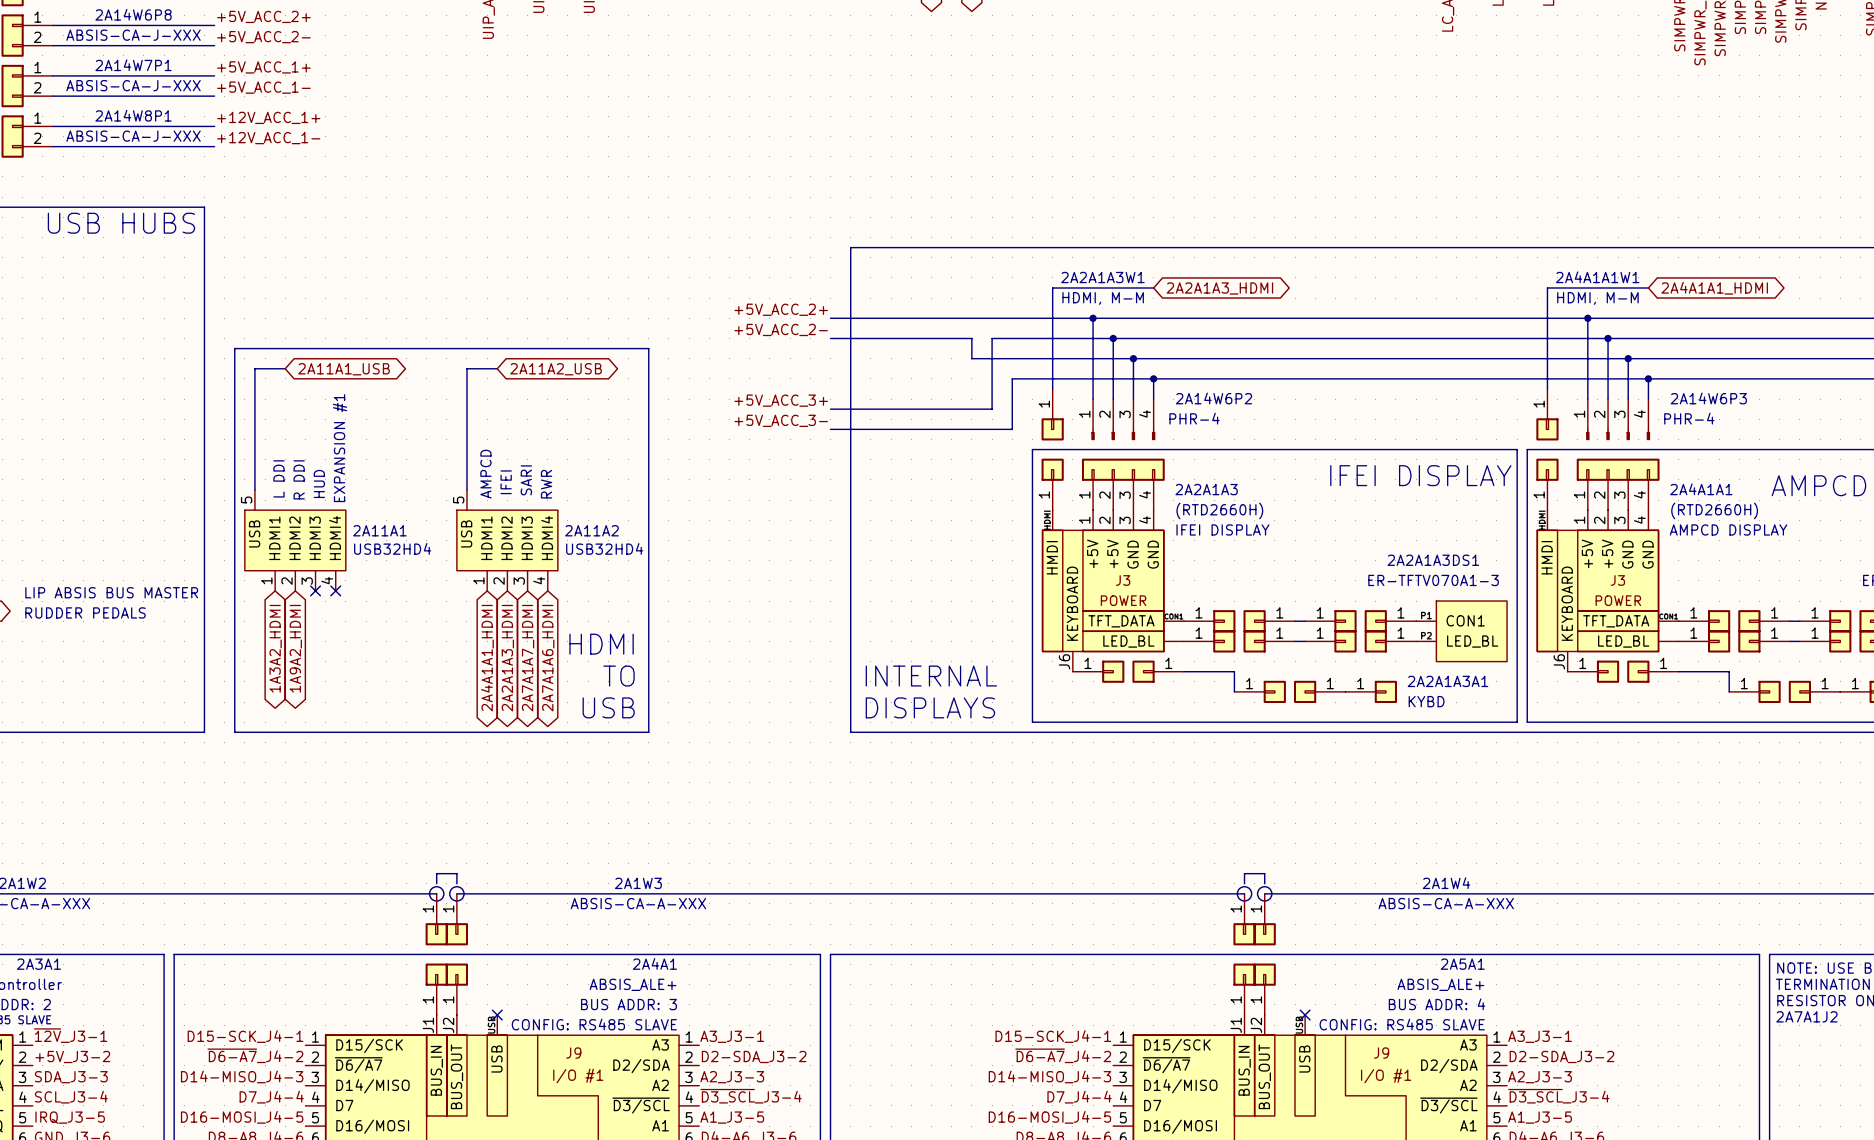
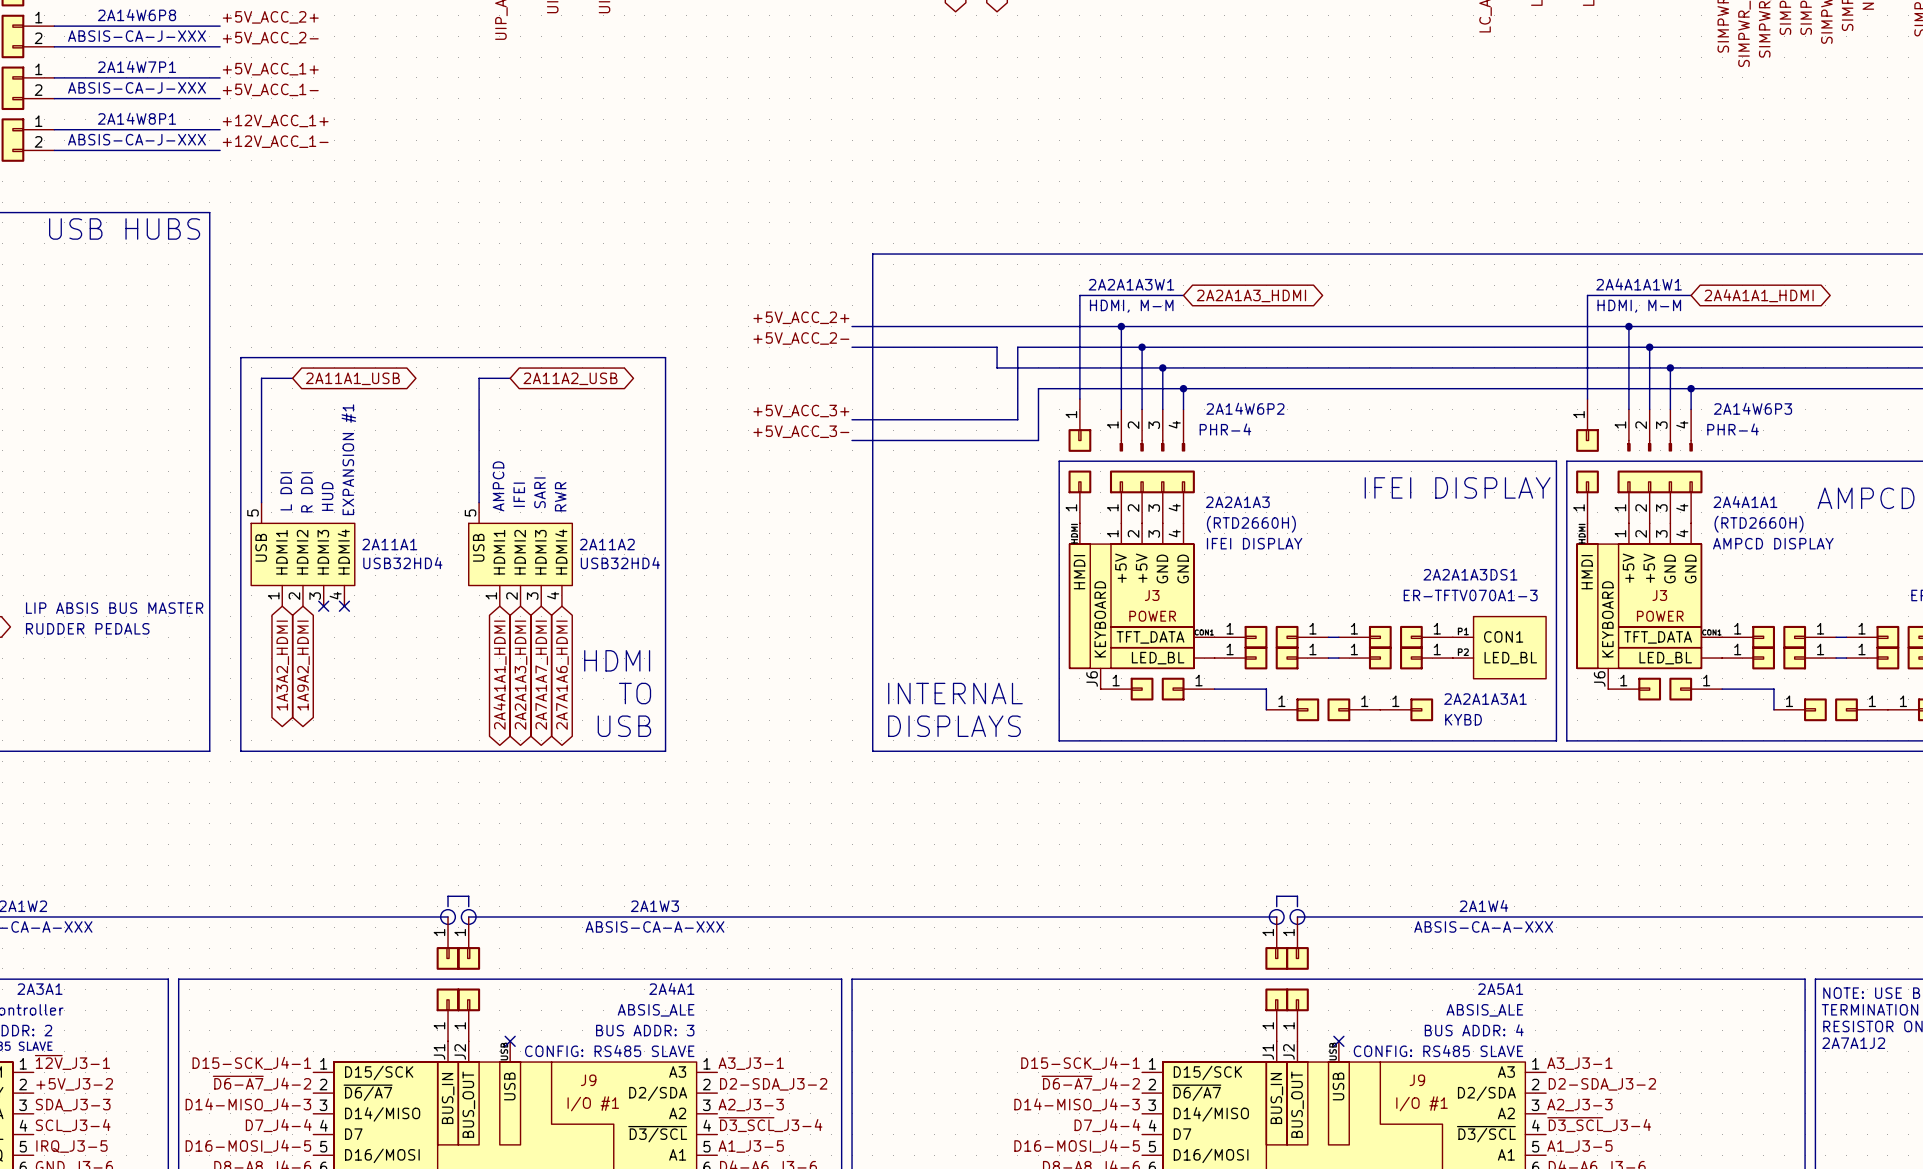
2A4A1 value: ABSIS_ALE+ (633, 984) -> ABSIS_ALE (656, 1010)
2A5A1 value: ABSIS_ALE+ (1440, 984) -> ABSIS_ALE (1484, 1010)

